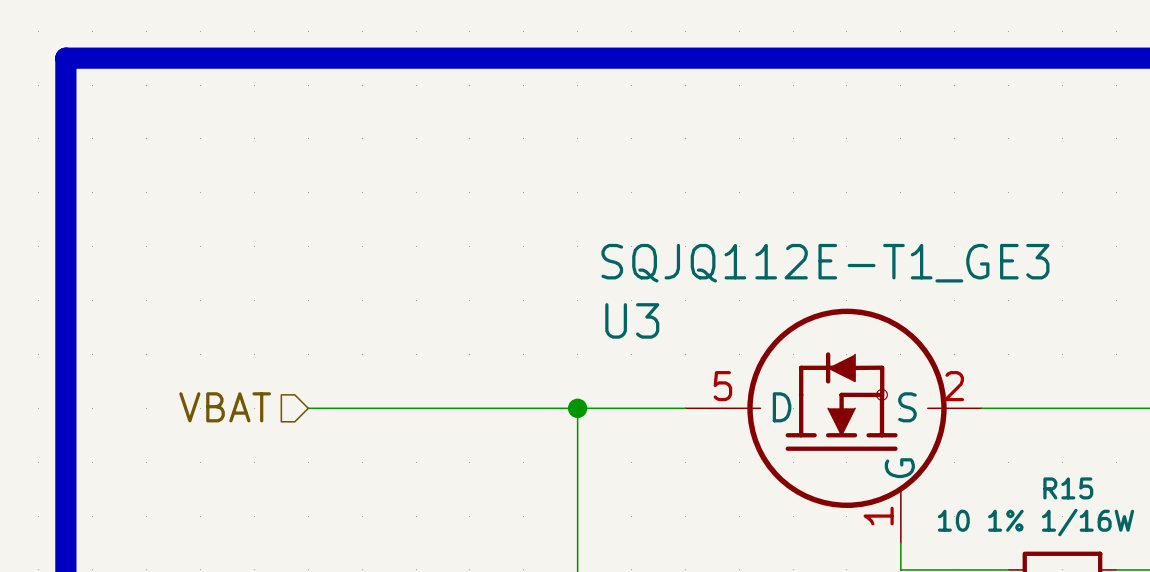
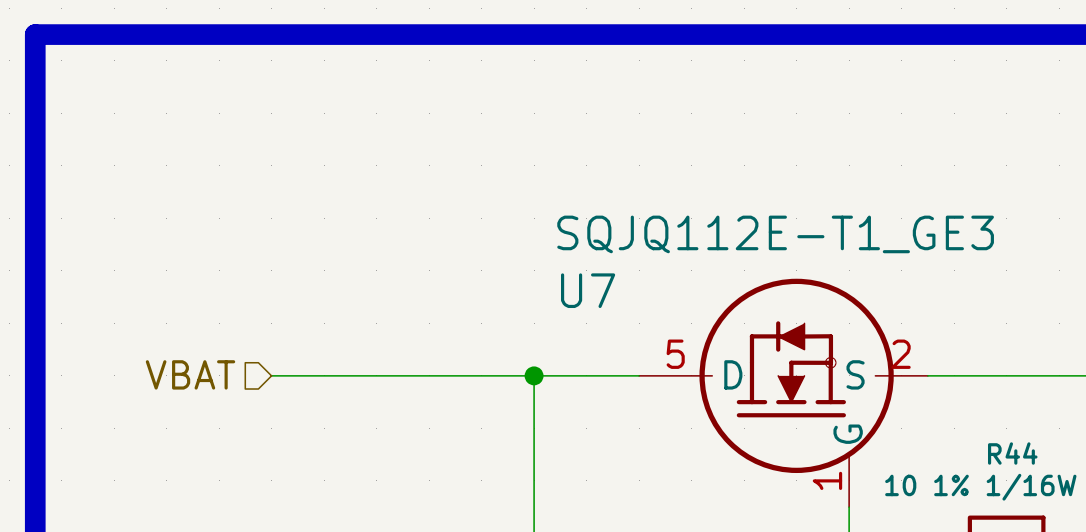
U3 name: U3 (632, 320) -> U7 (588, 290)
R15 name: R15 (1068, 488) -> R44 (1012, 453)

